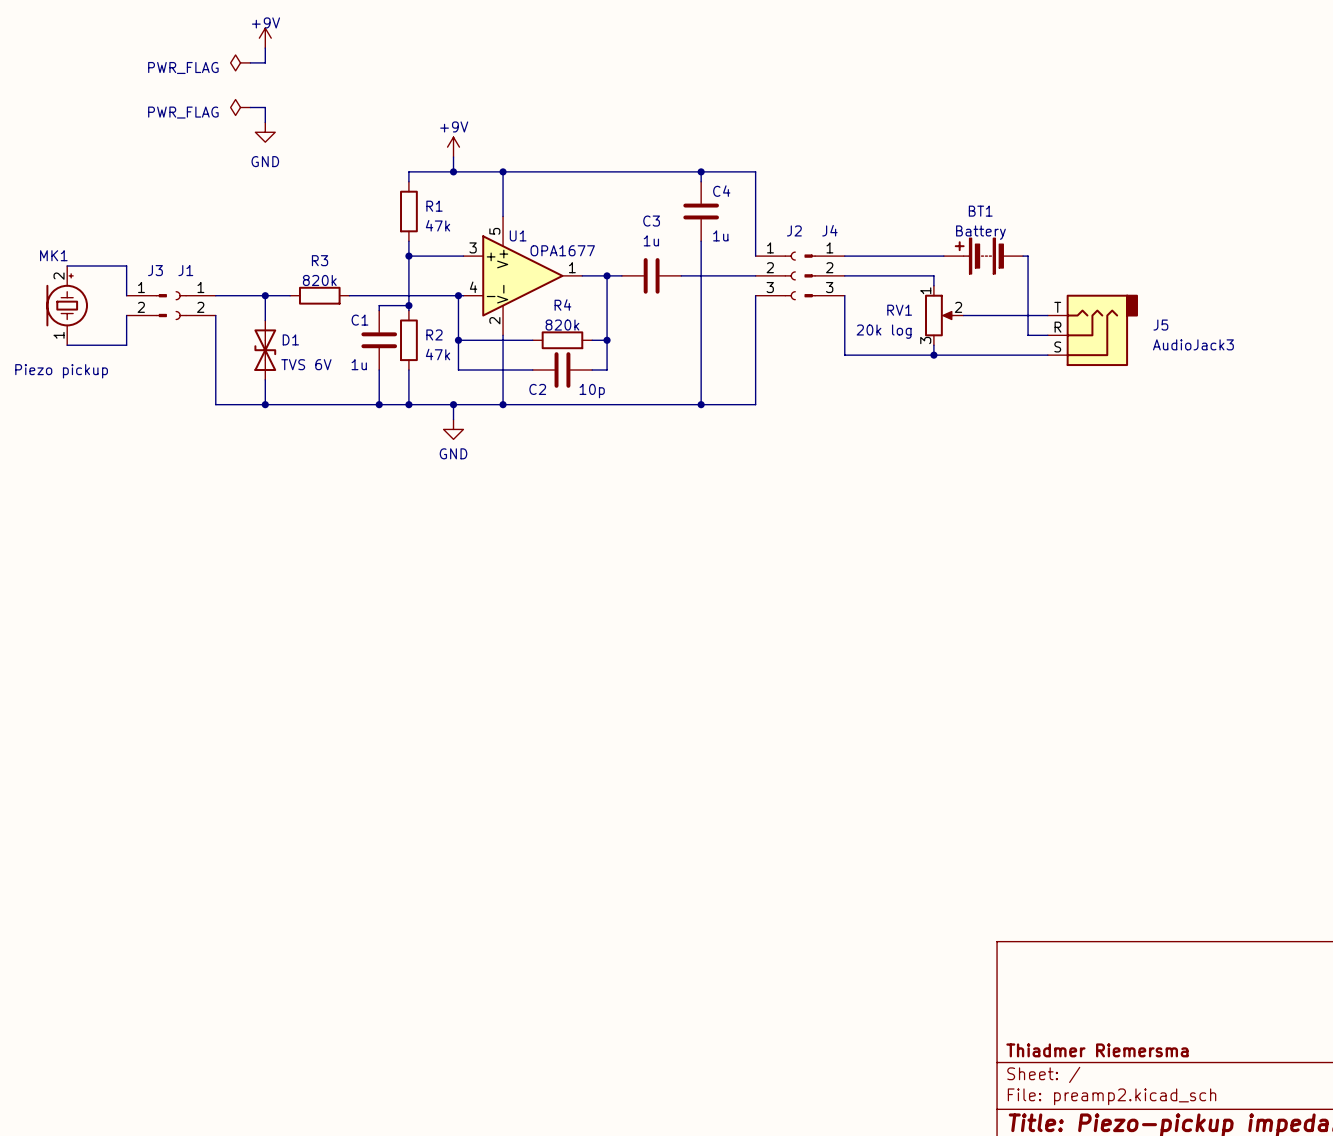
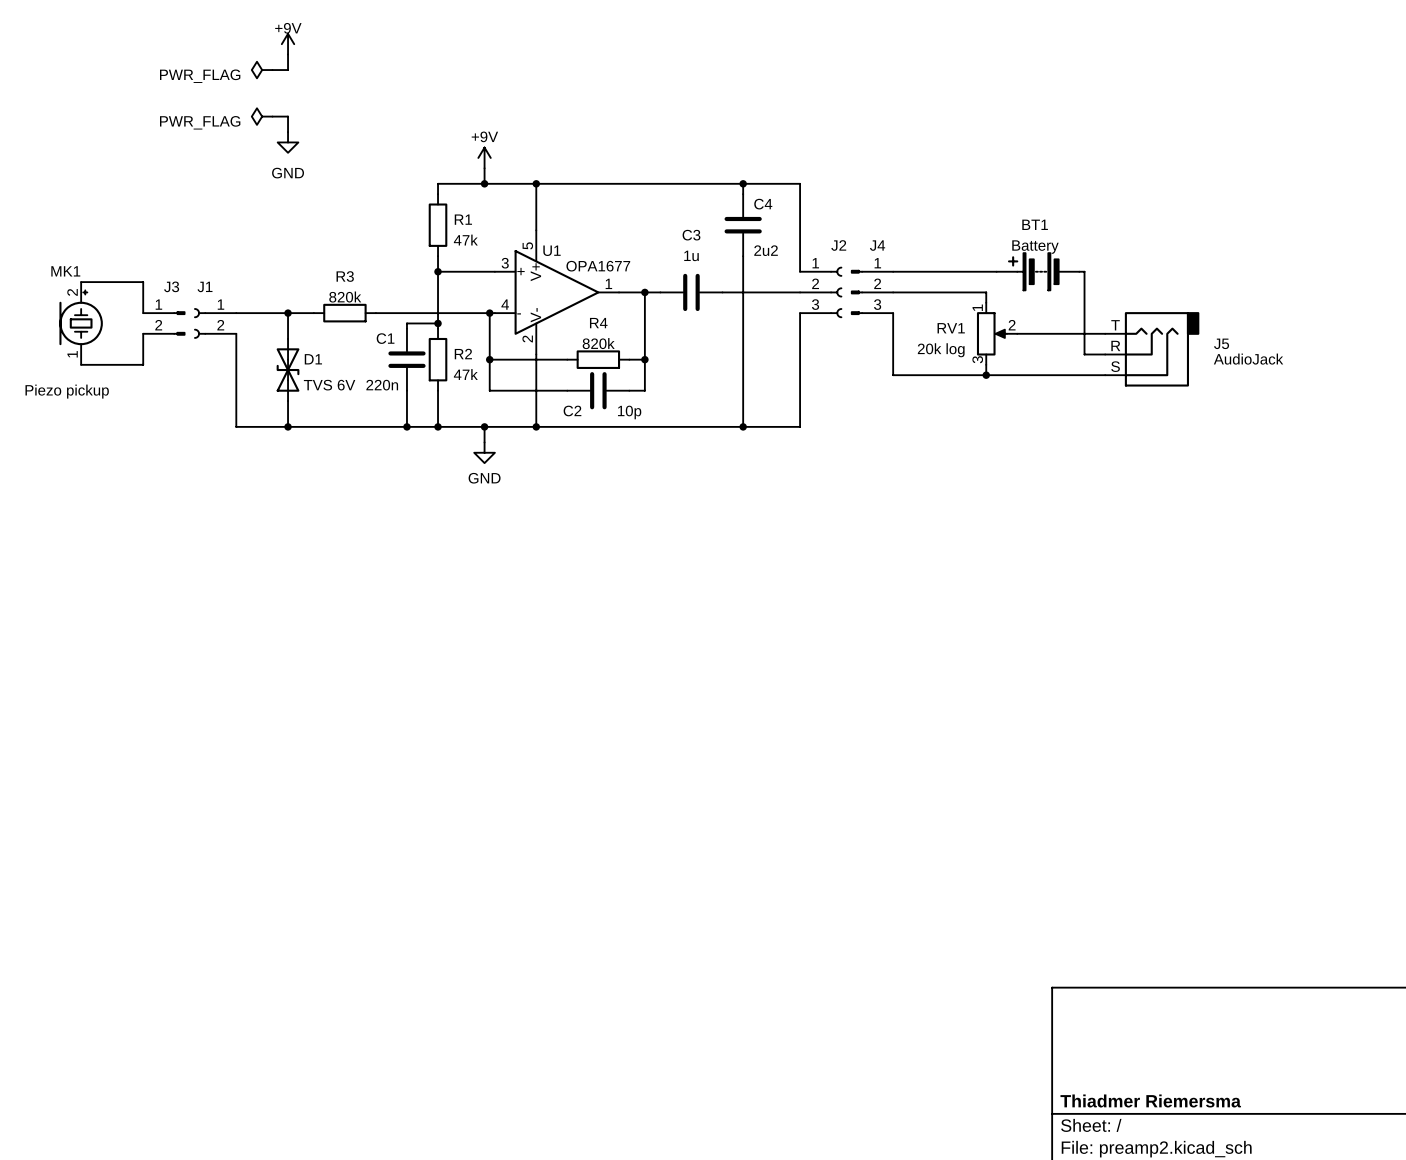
C4 value: 1u (720, 235) -> 2u2 (766, 250)
J5 value: AudioJack3 (1193, 344) -> AudioJack (1248, 359)
C1 value: 1u (359, 364) -> 220n (382, 385)

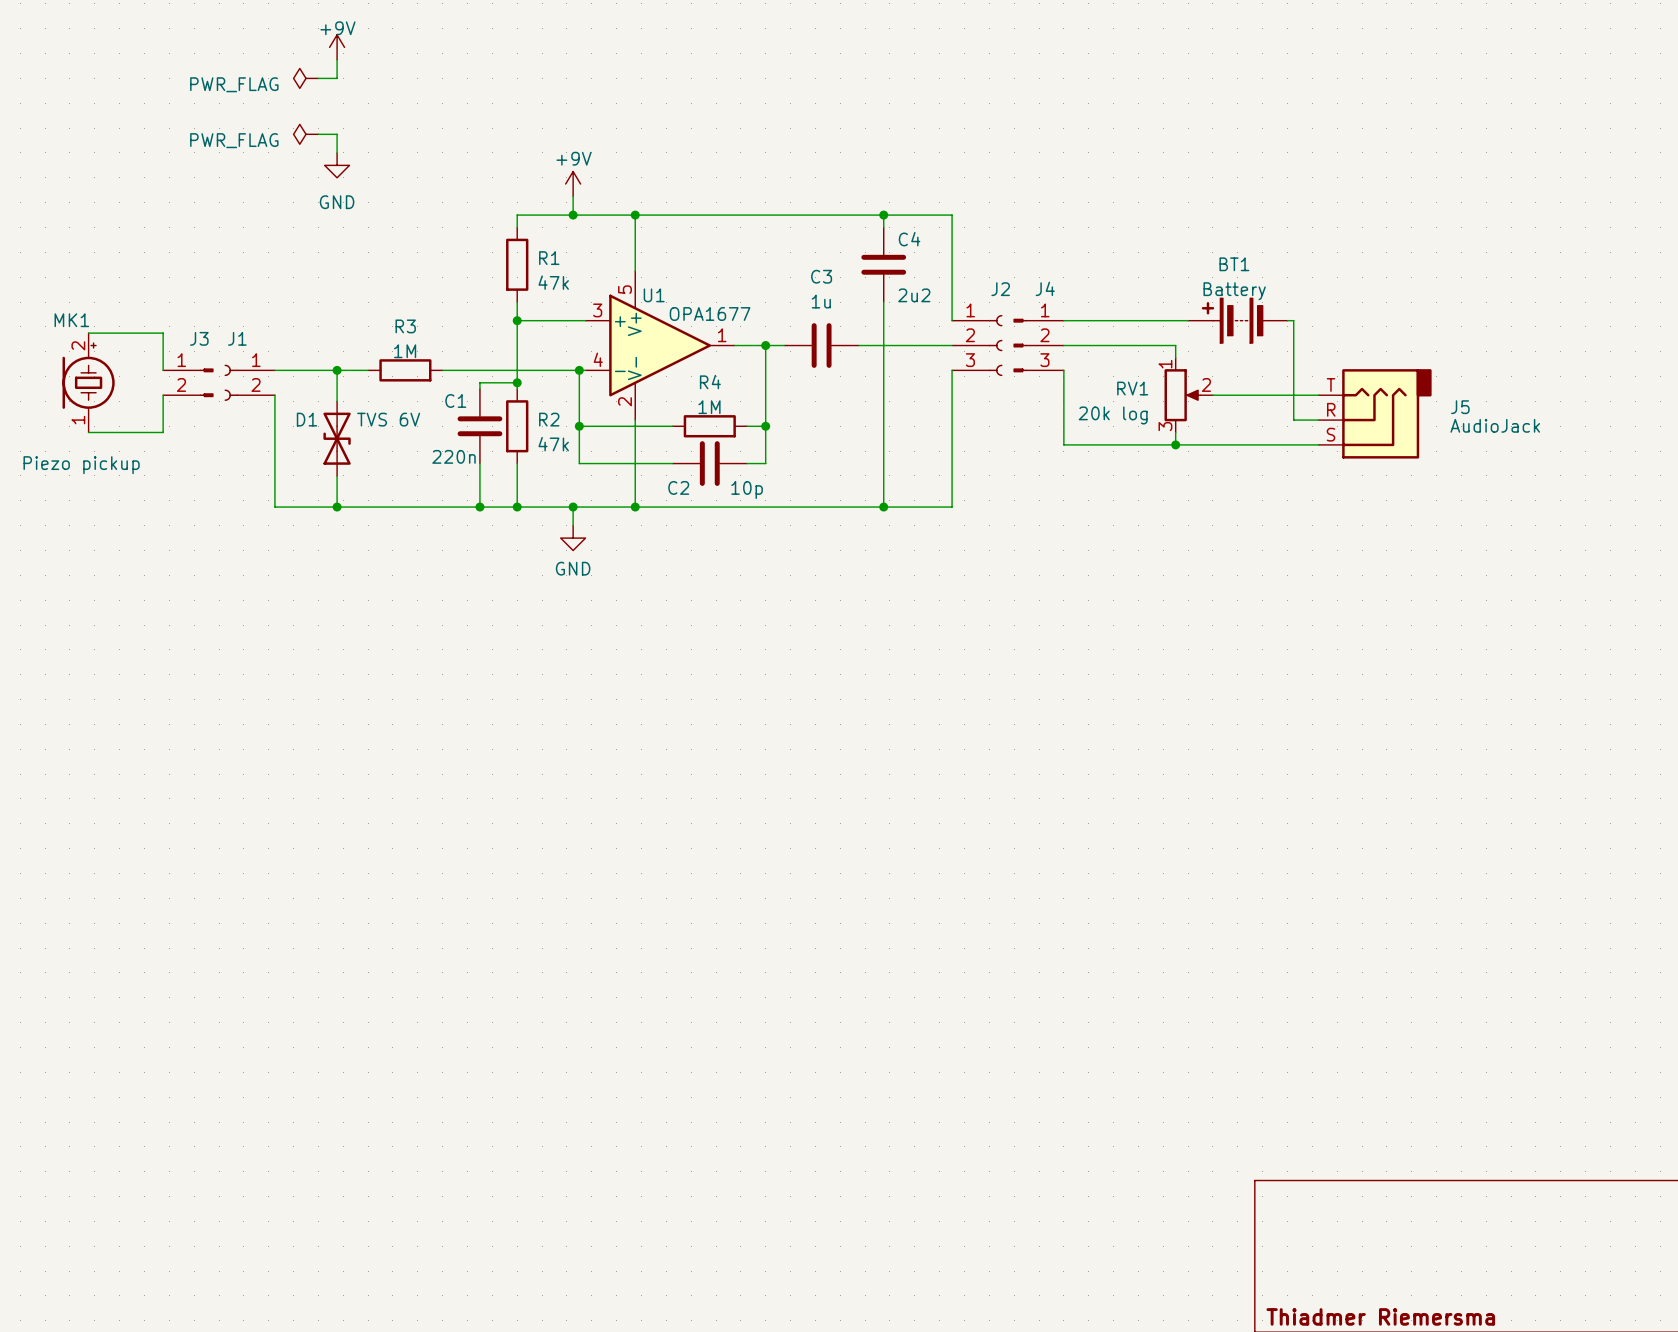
R3 value: 820k (345, 297) -> 1M (405, 351)
R4 value: 820k (598, 343) -> 1M (709, 407)
D1 name position: D1 (313, 359) -> D1 (306, 419)
D1 value position: TVS 6V (329, 385) -> TVS 6V (388, 419)

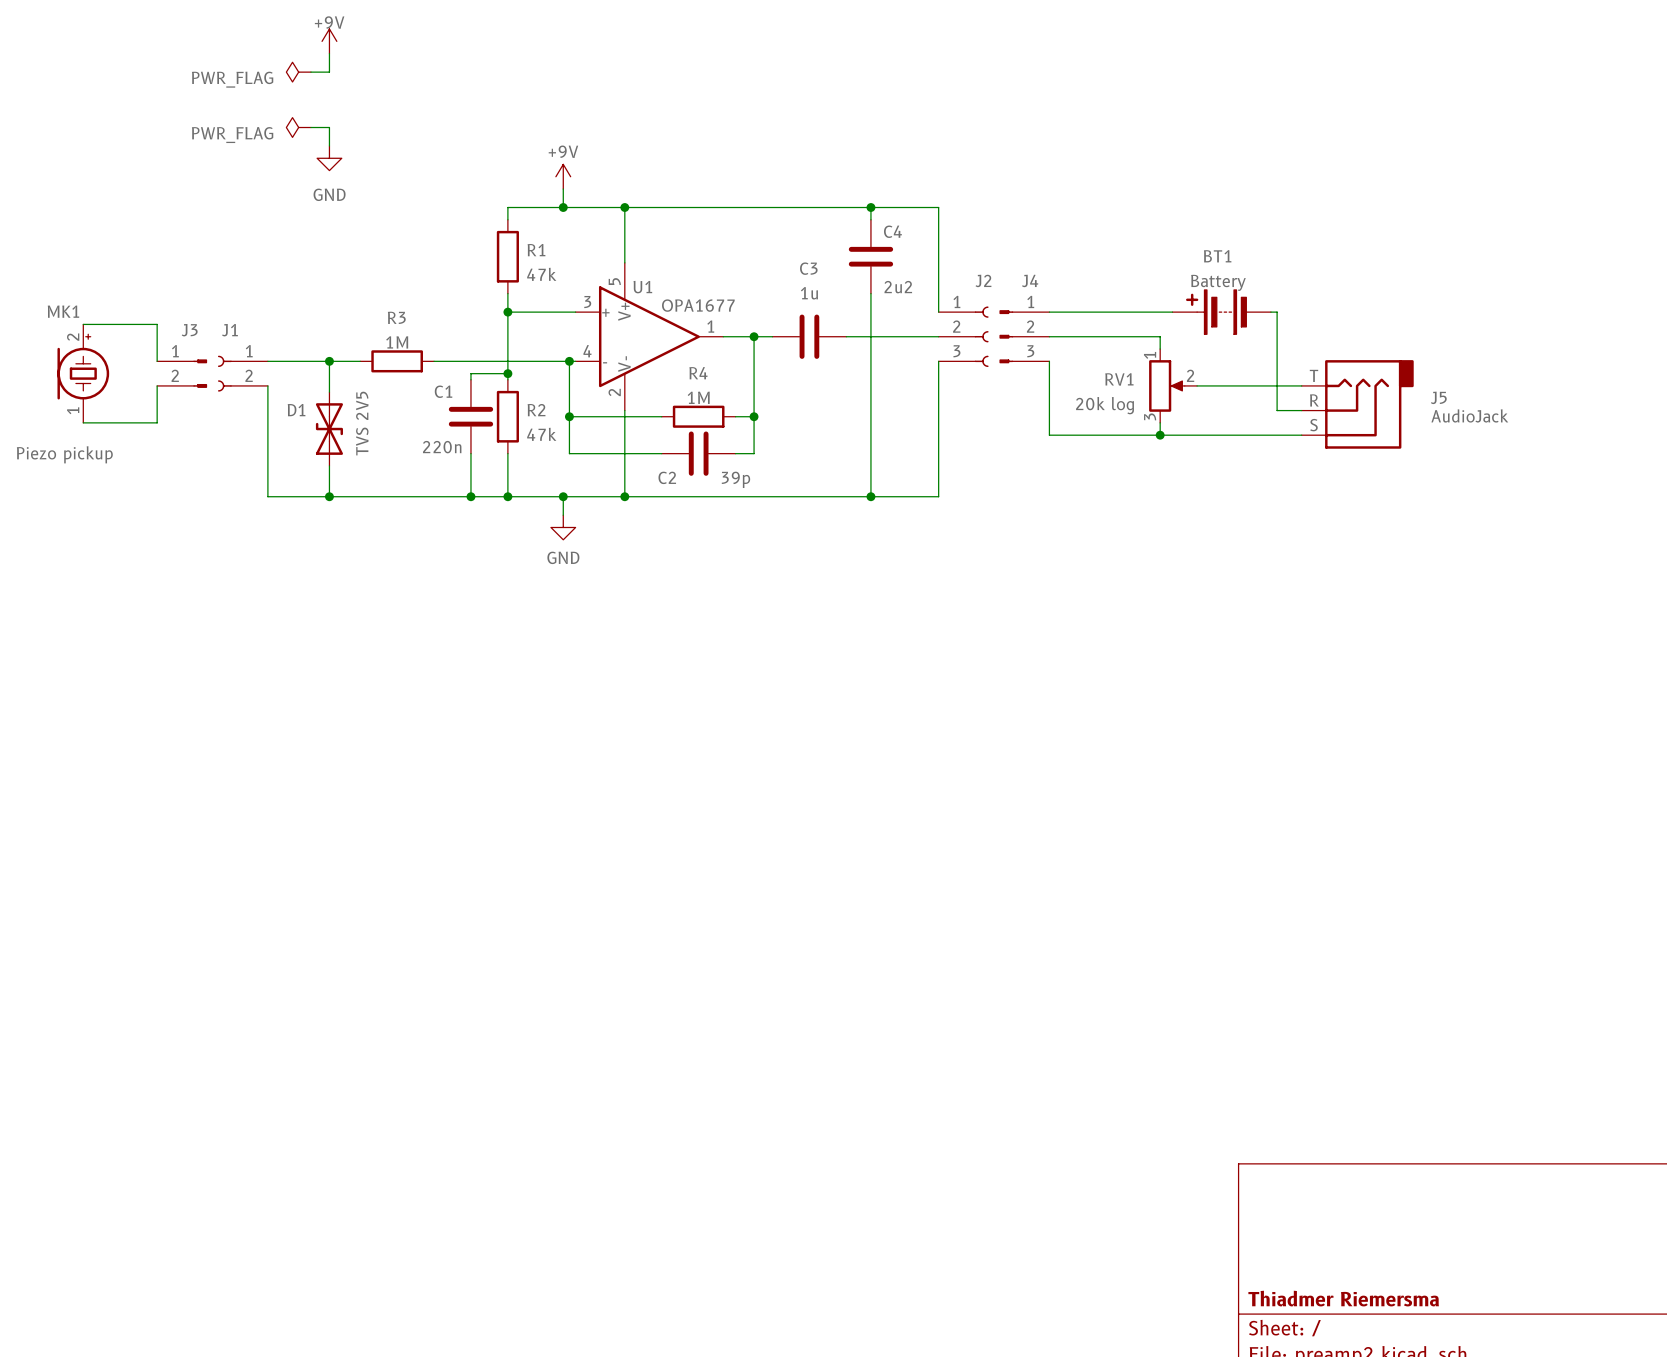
D1 value: TVS 6V (388, 419) -> TVS 2V5 (362, 423)
C2 value: 10p (747, 490) -> 39p (735, 479)

